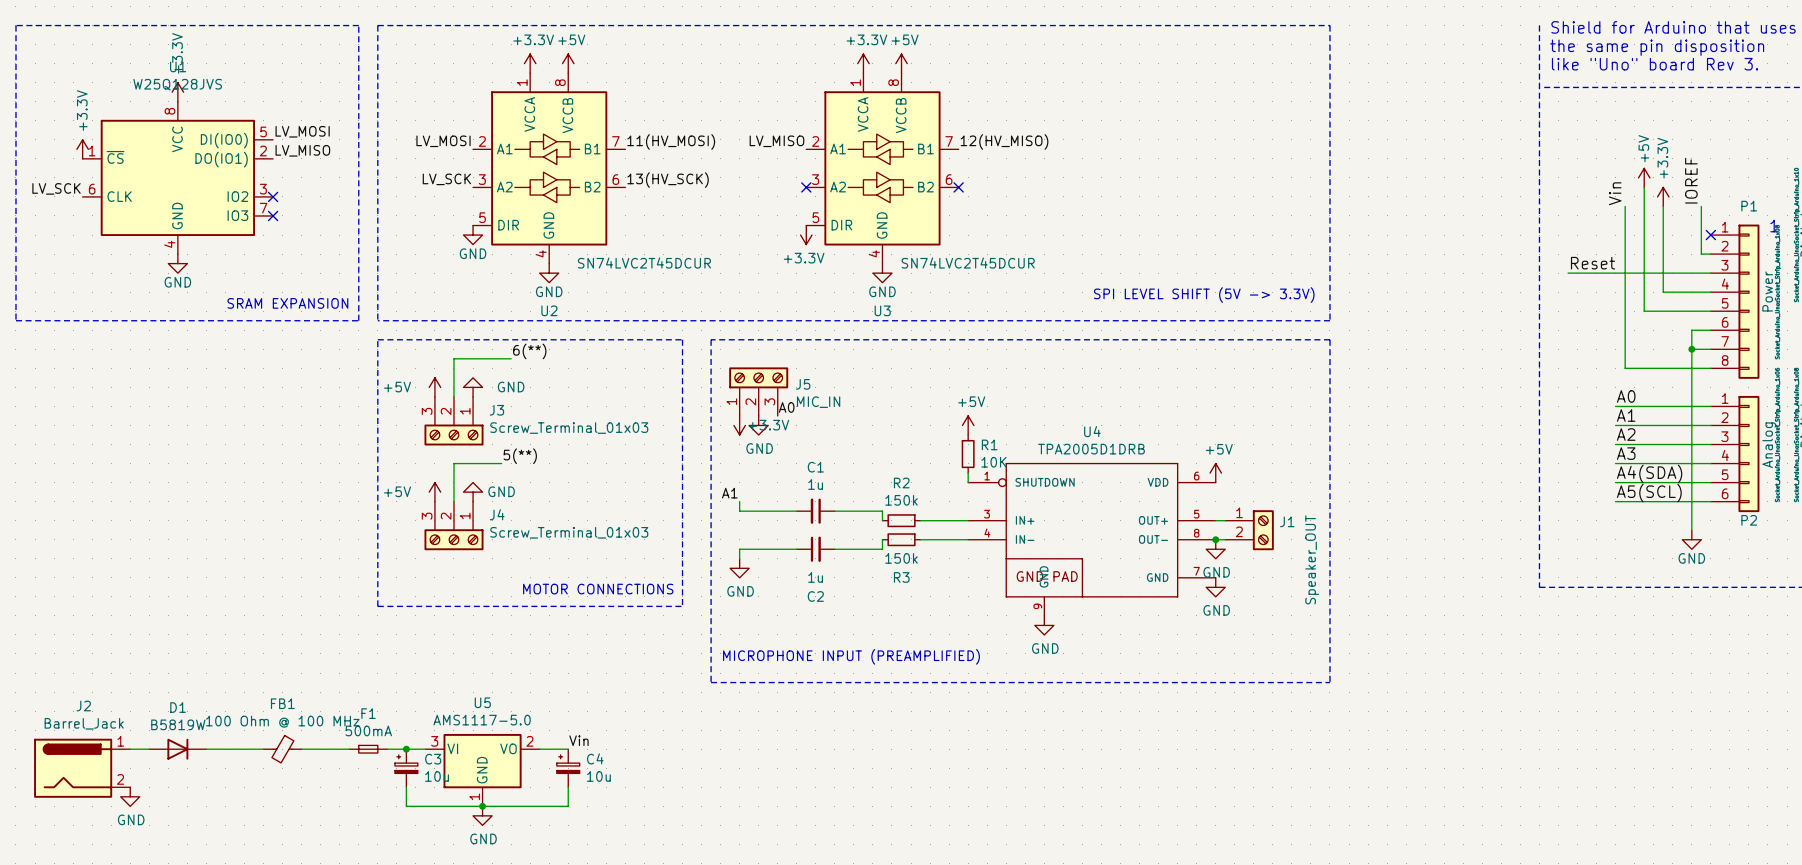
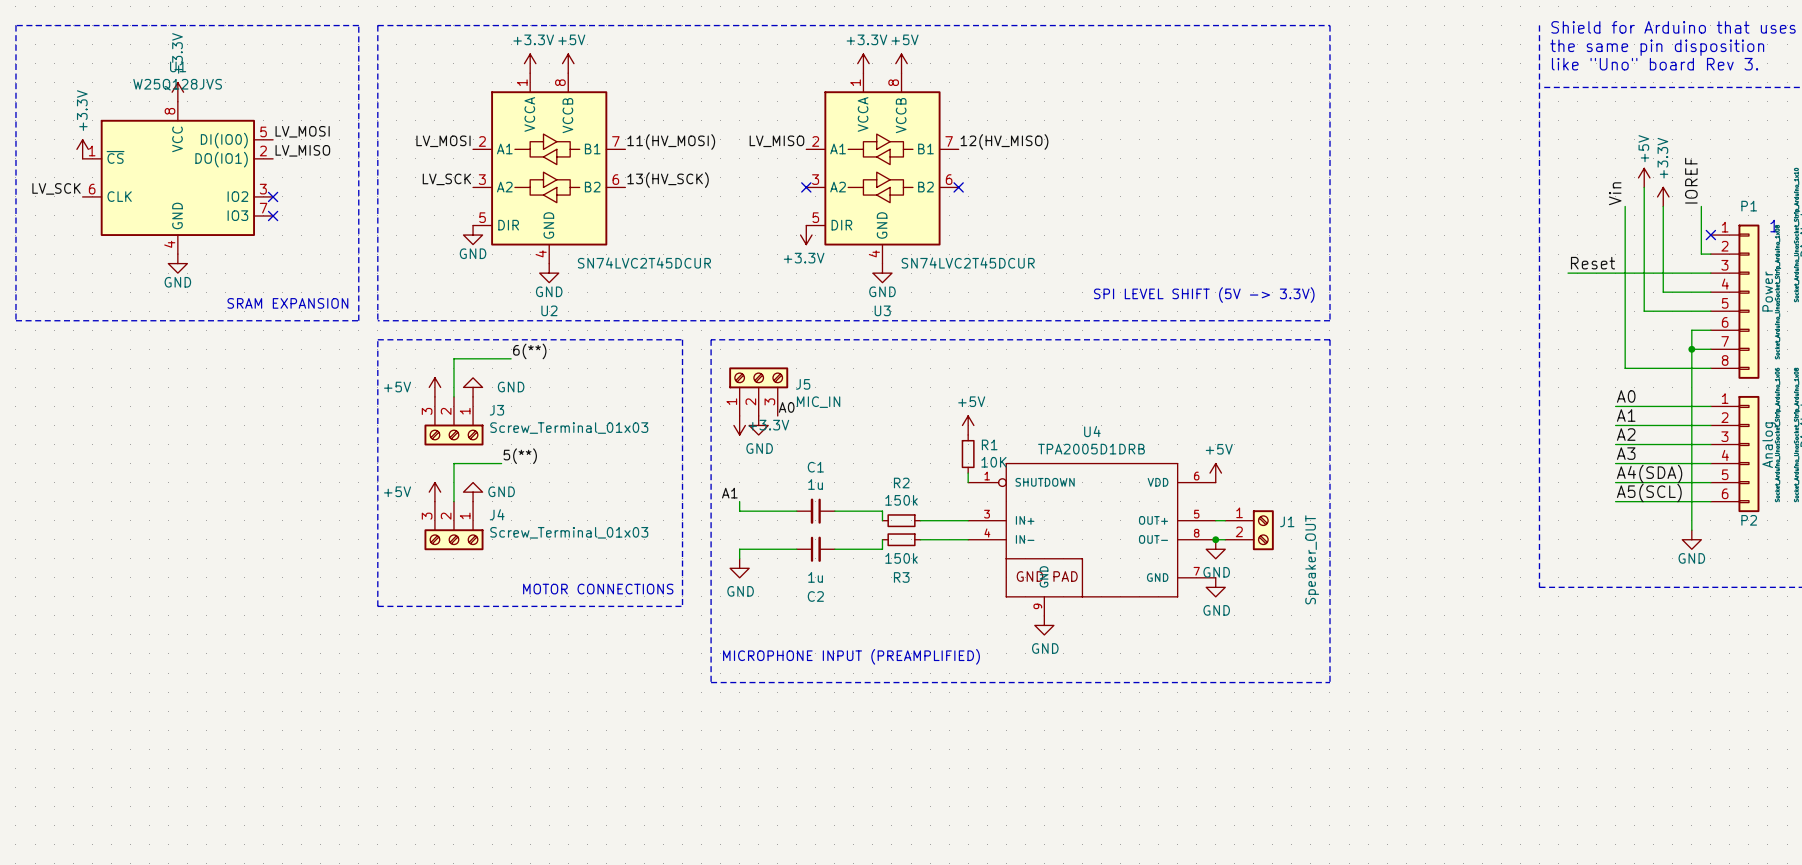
label: Vin (578, 740) -> none
wire: (130, 749) (149, 749) -> none
D1: B5819W (177, 749) -> none
wire: (206, 749) (263, 749) -> none
FB1: 100 Ohm @ 100 MHz (282, 749) -> none
wire: (301, 749) (349, 749) -> none
F1: 500mA (368, 749) -> none
wire: (387, 749) (425, 749) -> none
junction: (406, 749) -> none
wire: (539, 749) (568, 749) -> none
J2: Barrel_Jack (82, 768) -> none
C3: 10u (406, 768) -> none
C4: 10u (568, 768) -> none
U5: AMS1117-5.0 (482, 770) -> none
wire: (406, 787) (406, 806) (568, 806) (568, 787) -> none
power symbol: GND (130, 796) -> none
junction: (482, 806) -> none
power symbol: GND (482, 815) -> none

